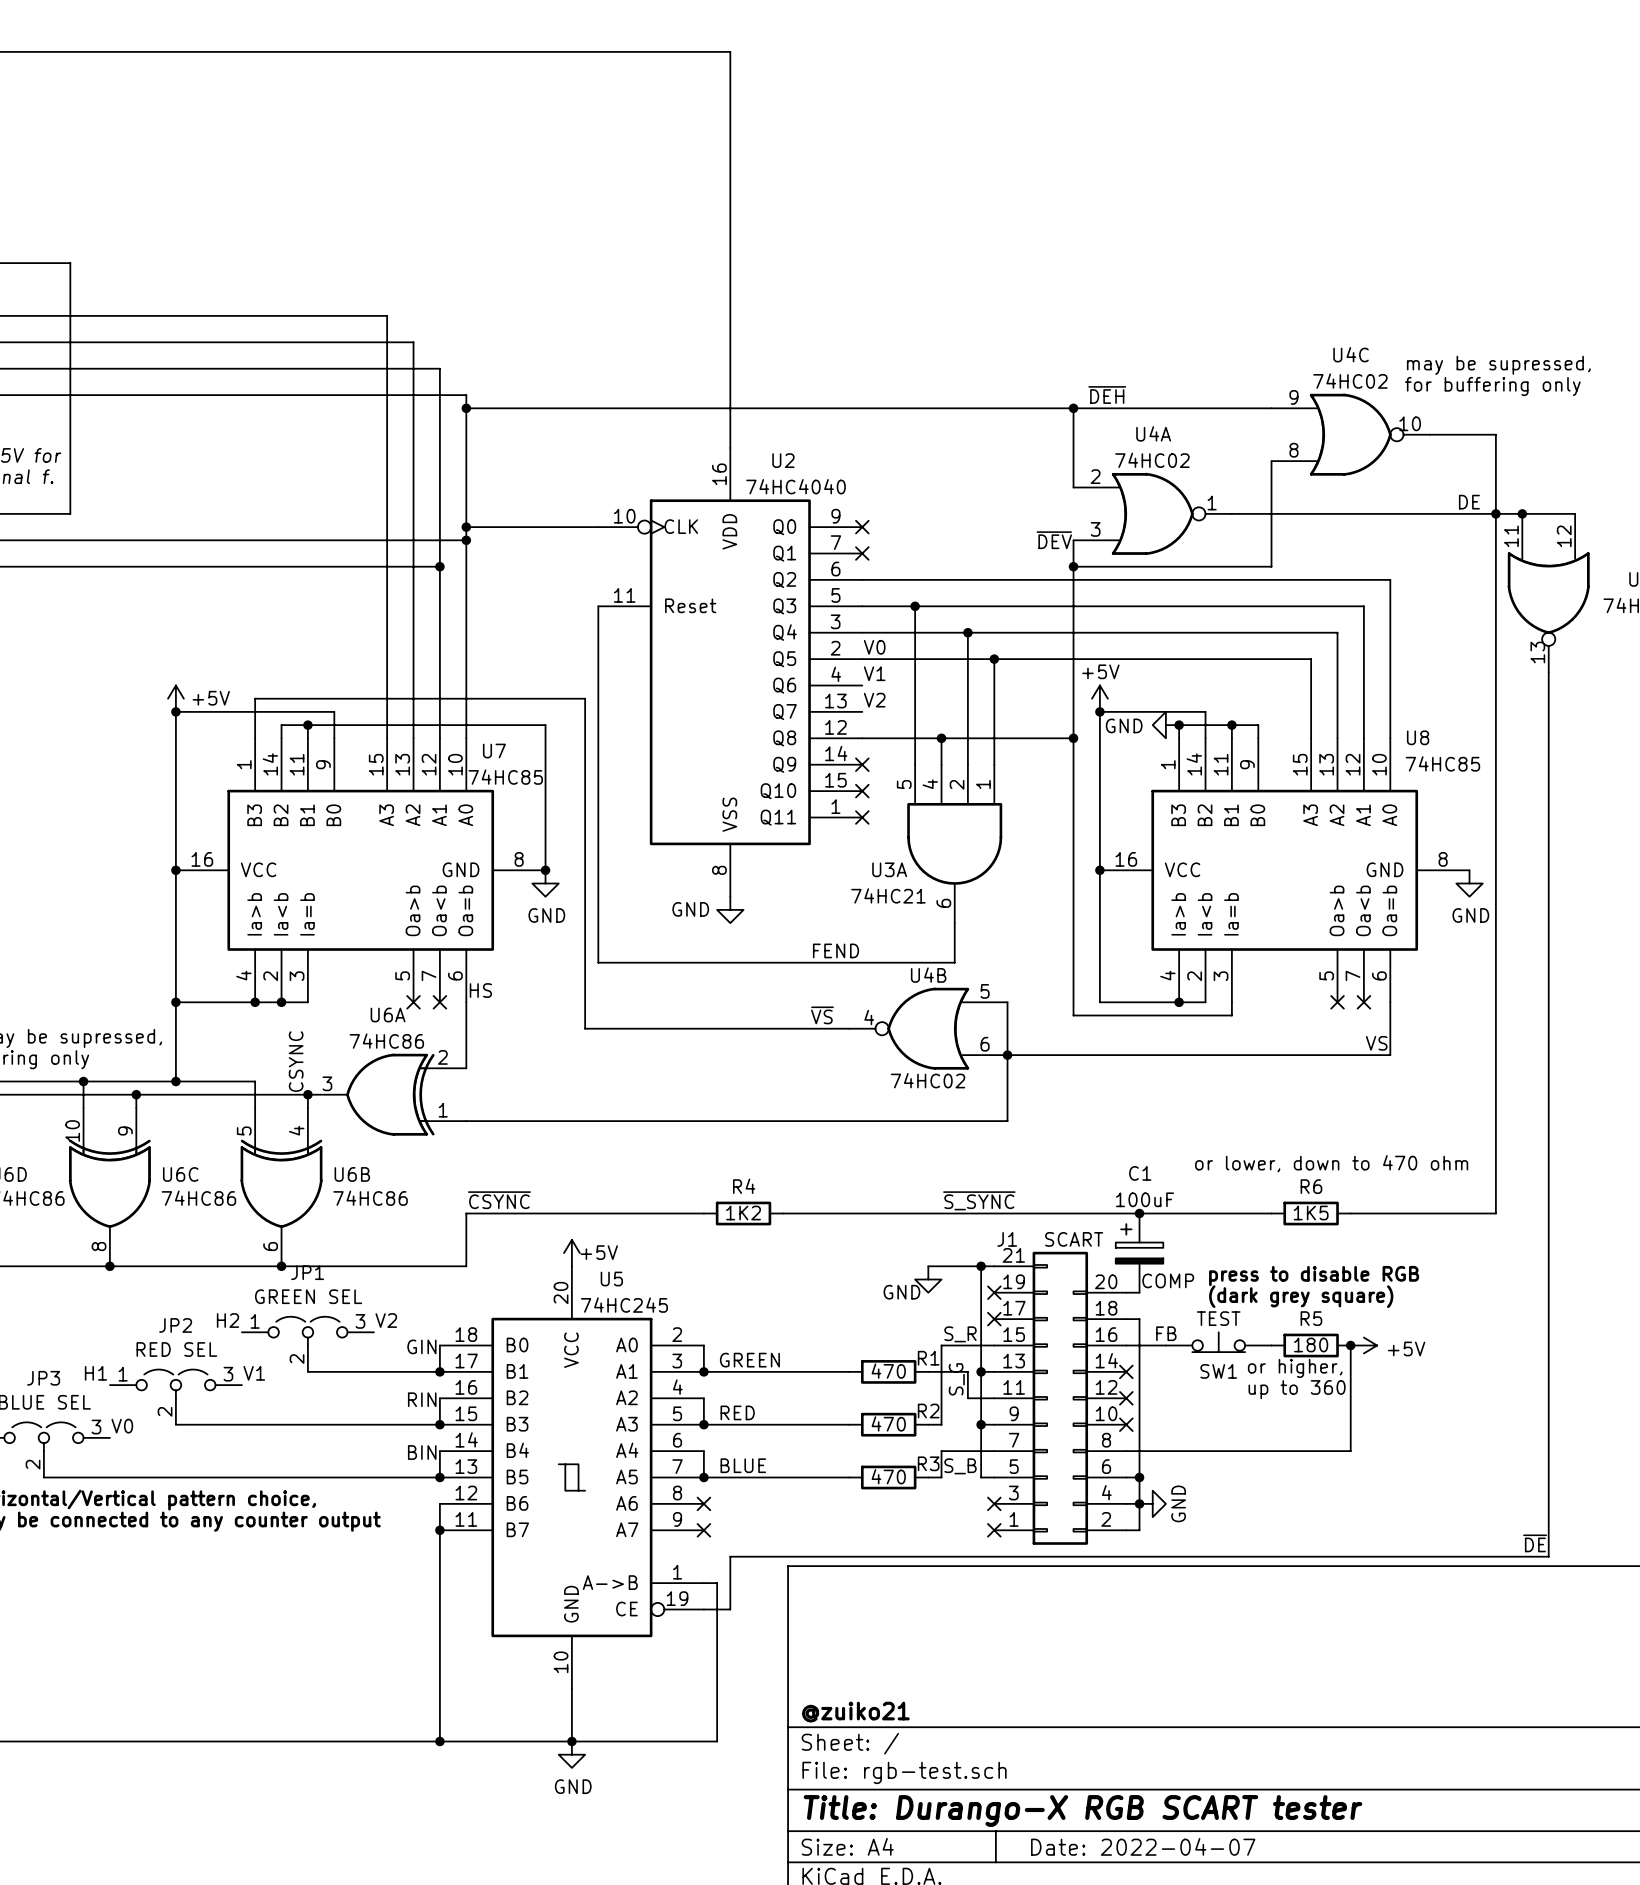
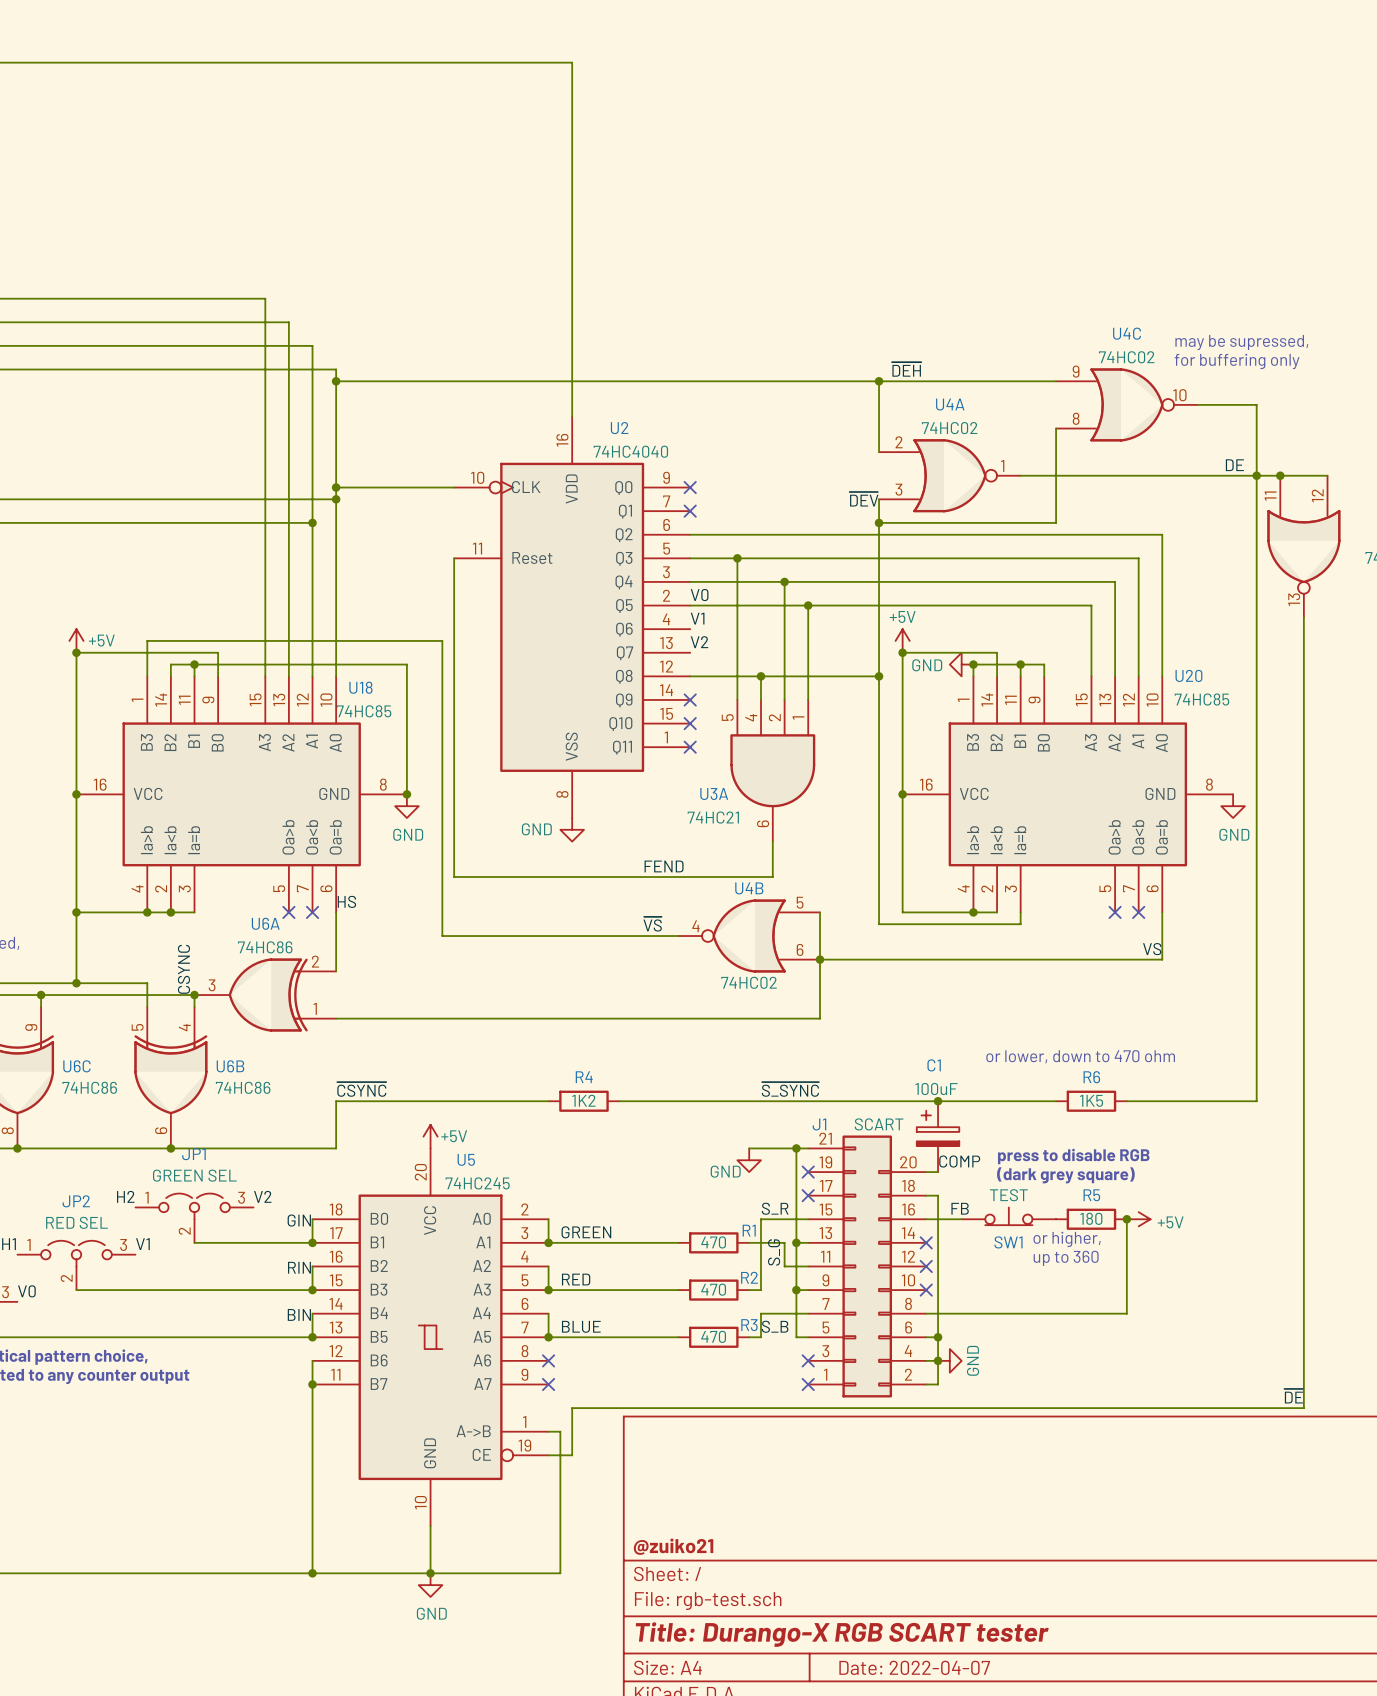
U8 name: U8 (1418, 737) -> U20 (1188, 675)
U7 name: U7 (494, 751) -> U18 (360, 687)

